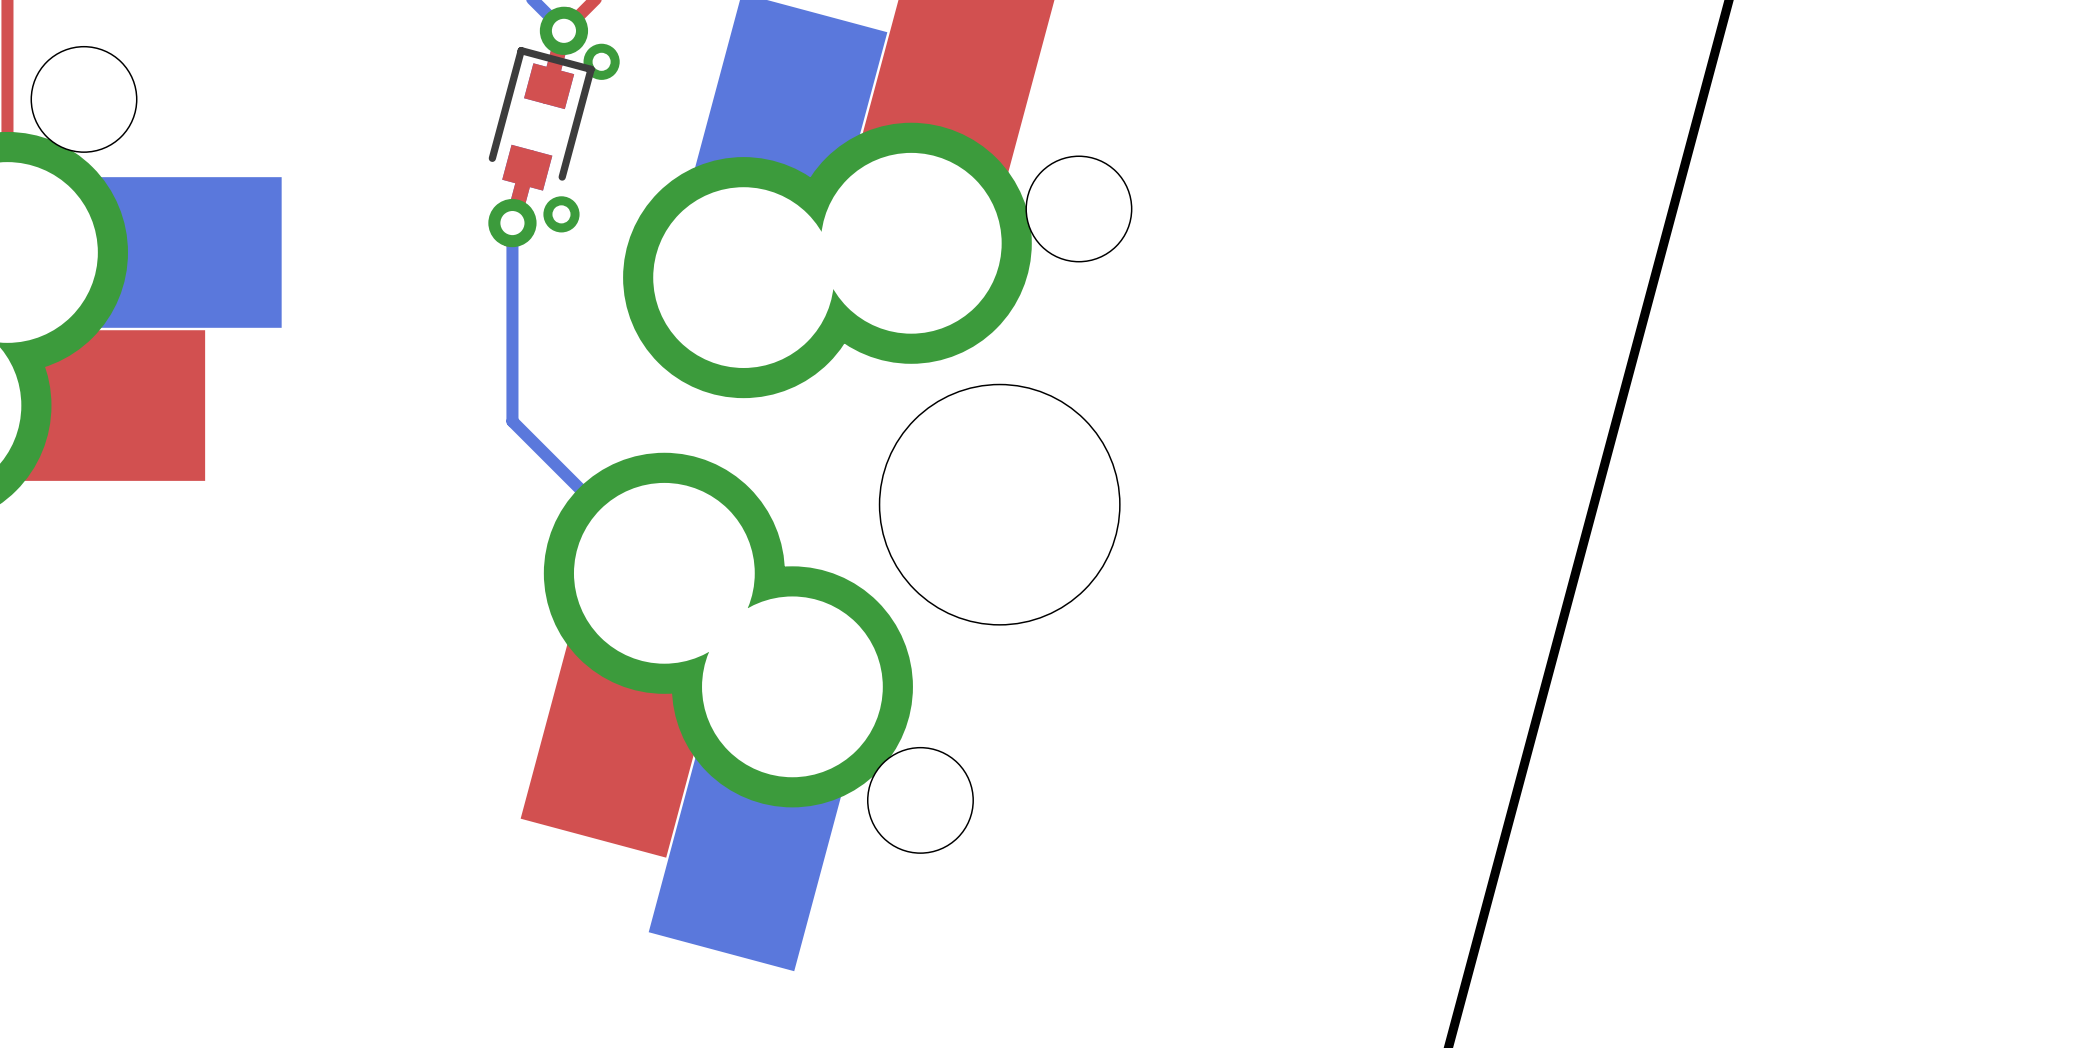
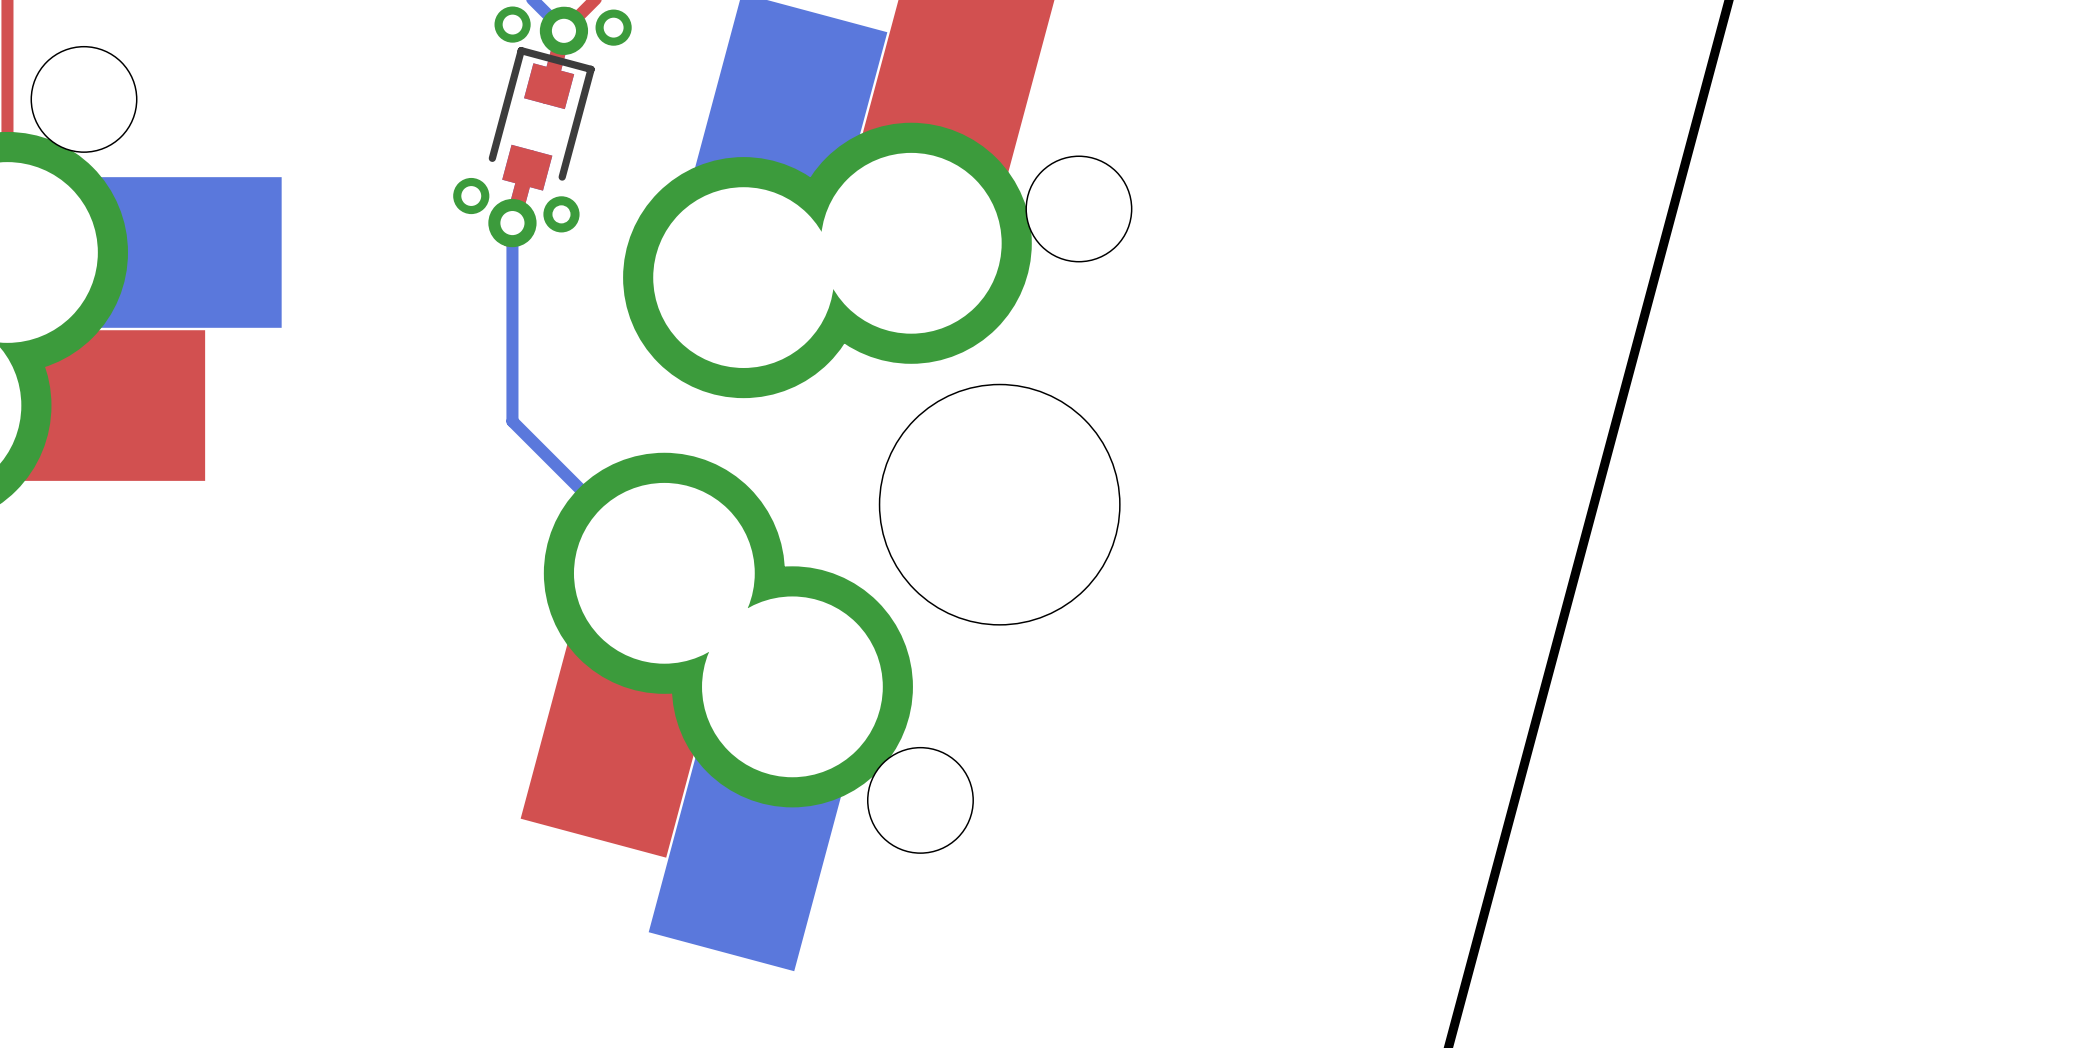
via: none -> (512, 24)
via position: (601, 61) -> (613, 27)
via: none -> (471, 196)

